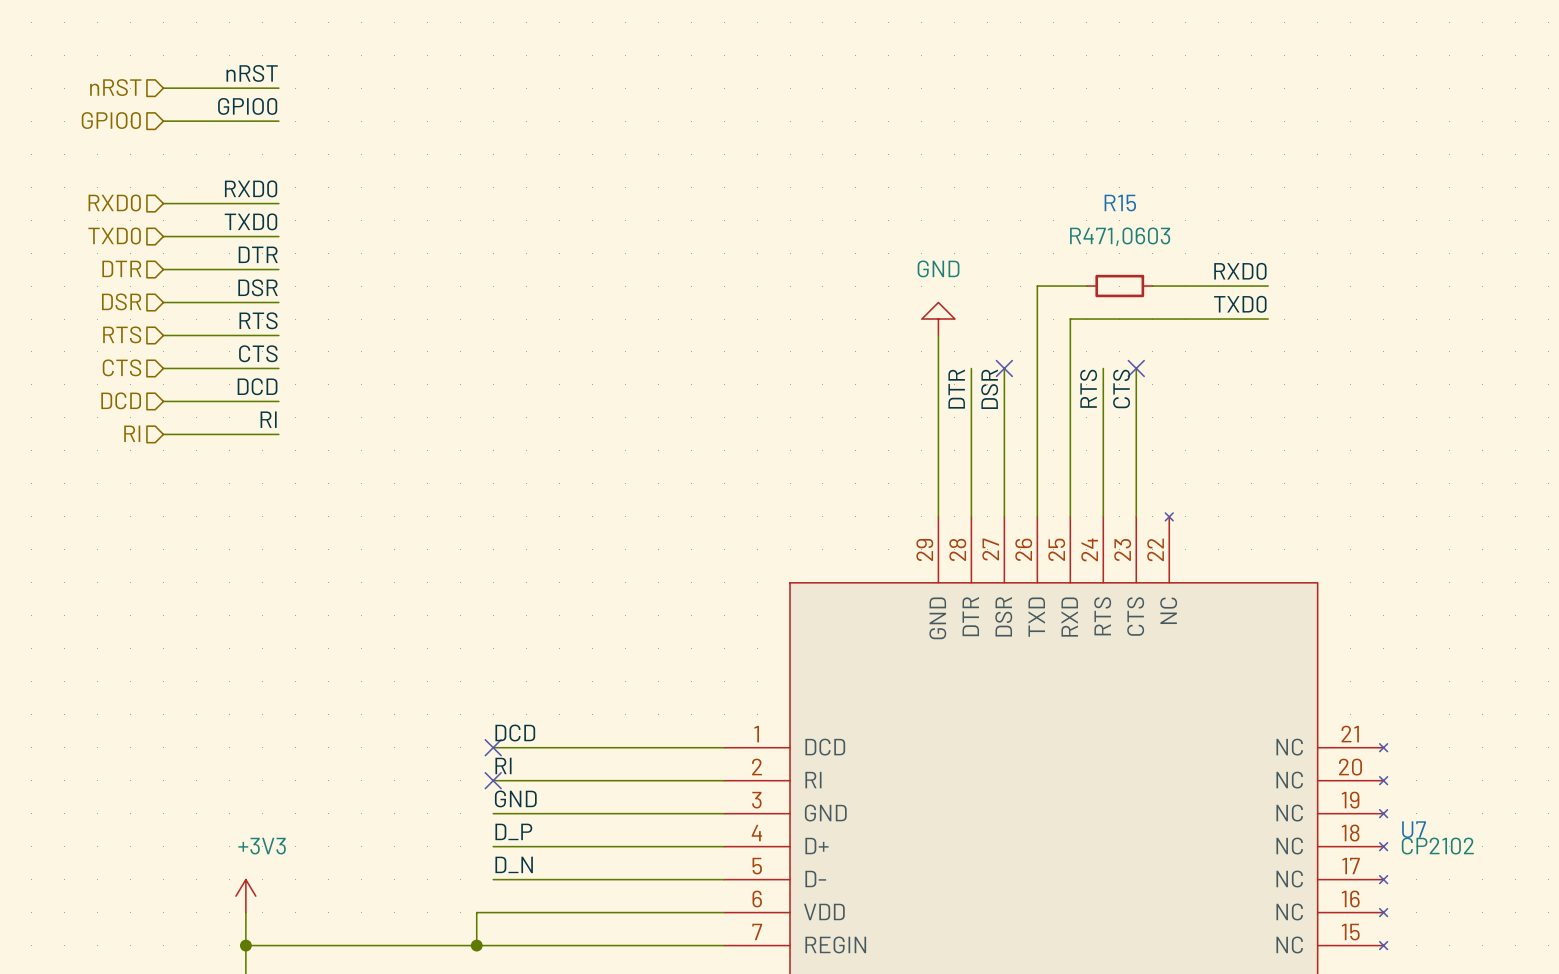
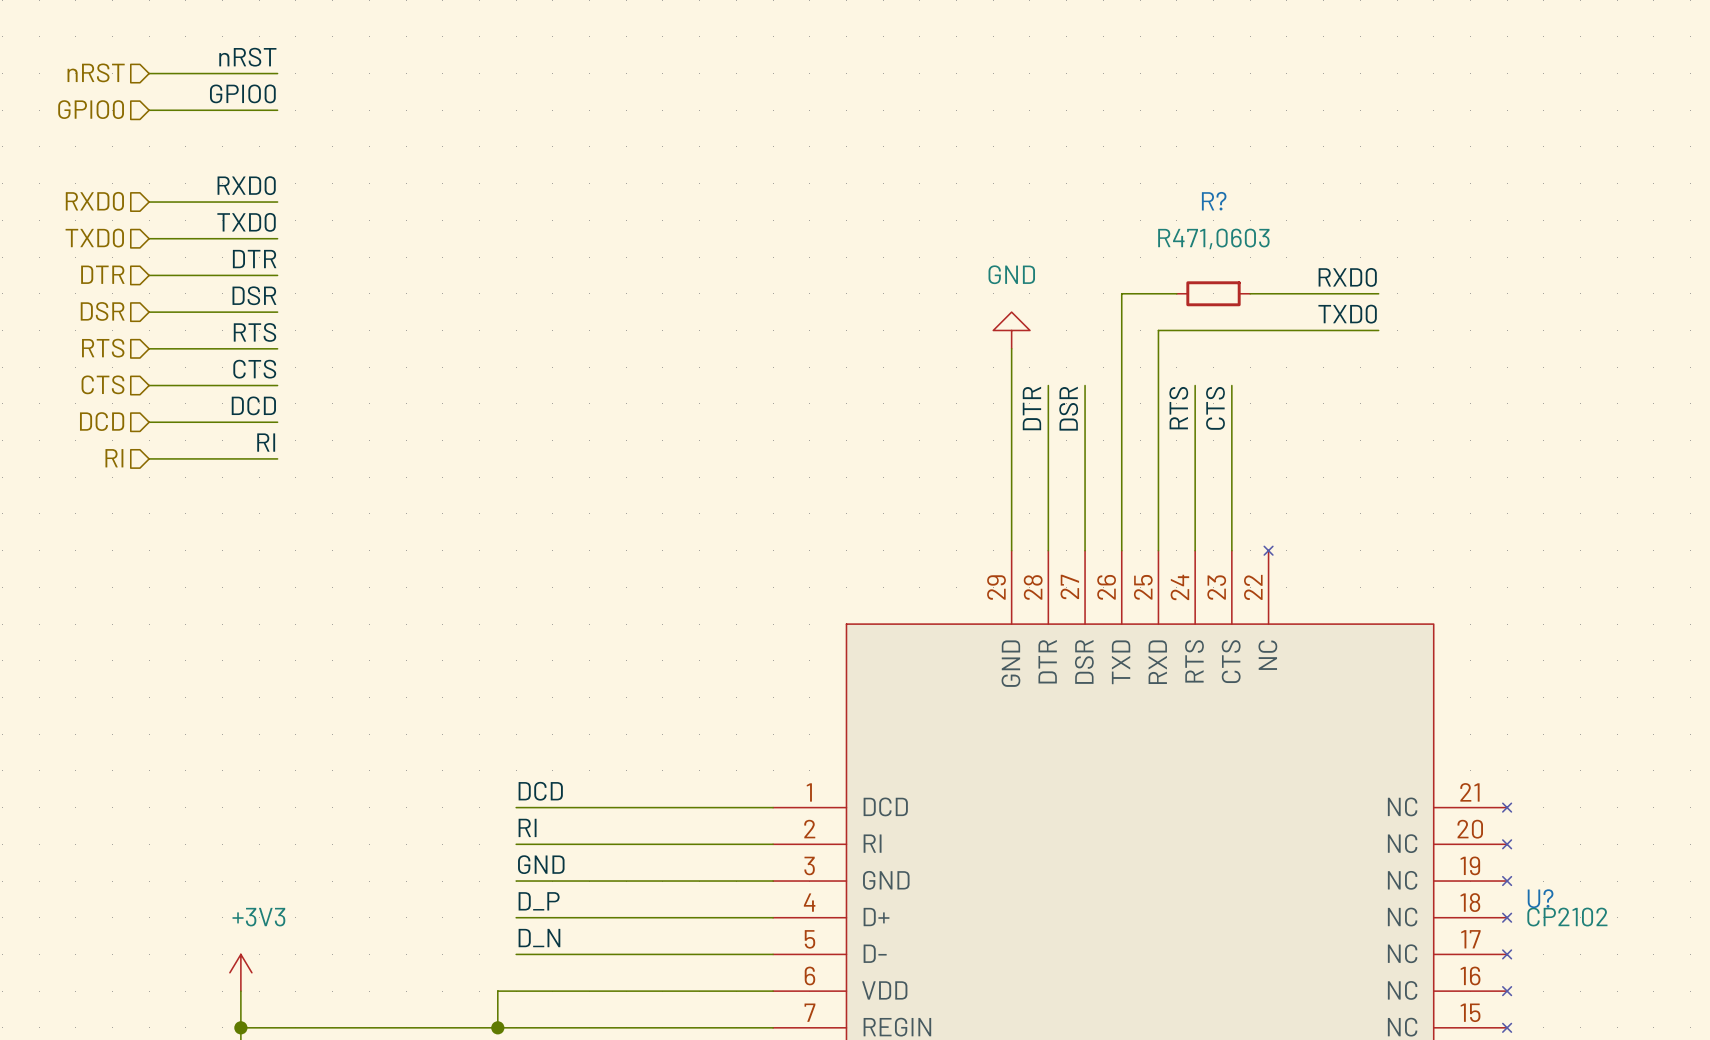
R15 name: R15 (1120, 203) -> R? (1214, 201)
no-connect mark: (1004, 368) -> none
no-connect mark: (1136, 368) -> none
no-connect mark: (493, 747) -> none
no-connect mark: (493, 780) -> none
U7 name: U7 (1414, 829) -> U? (1540, 898)

